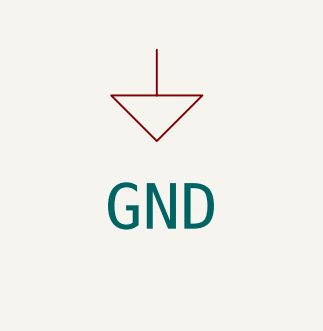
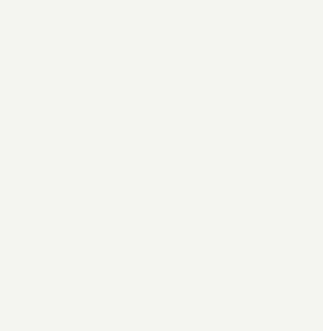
power symbol: GND (156, 95) -> none

